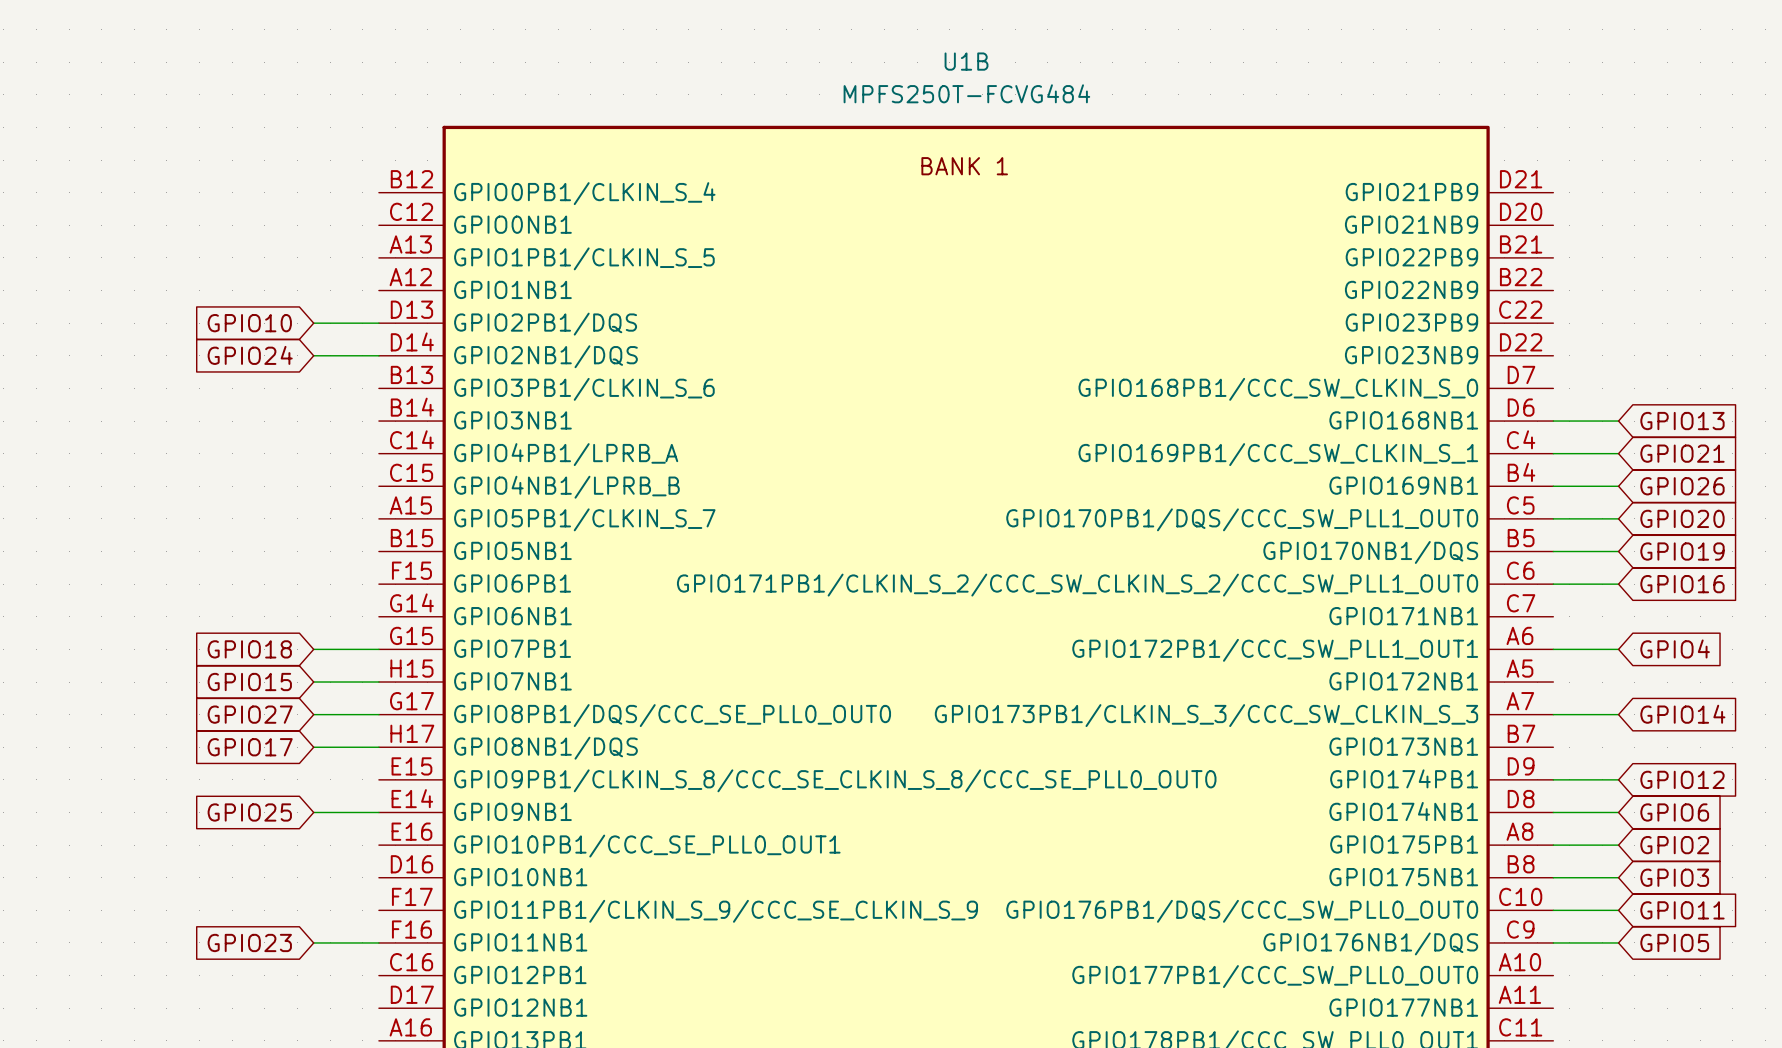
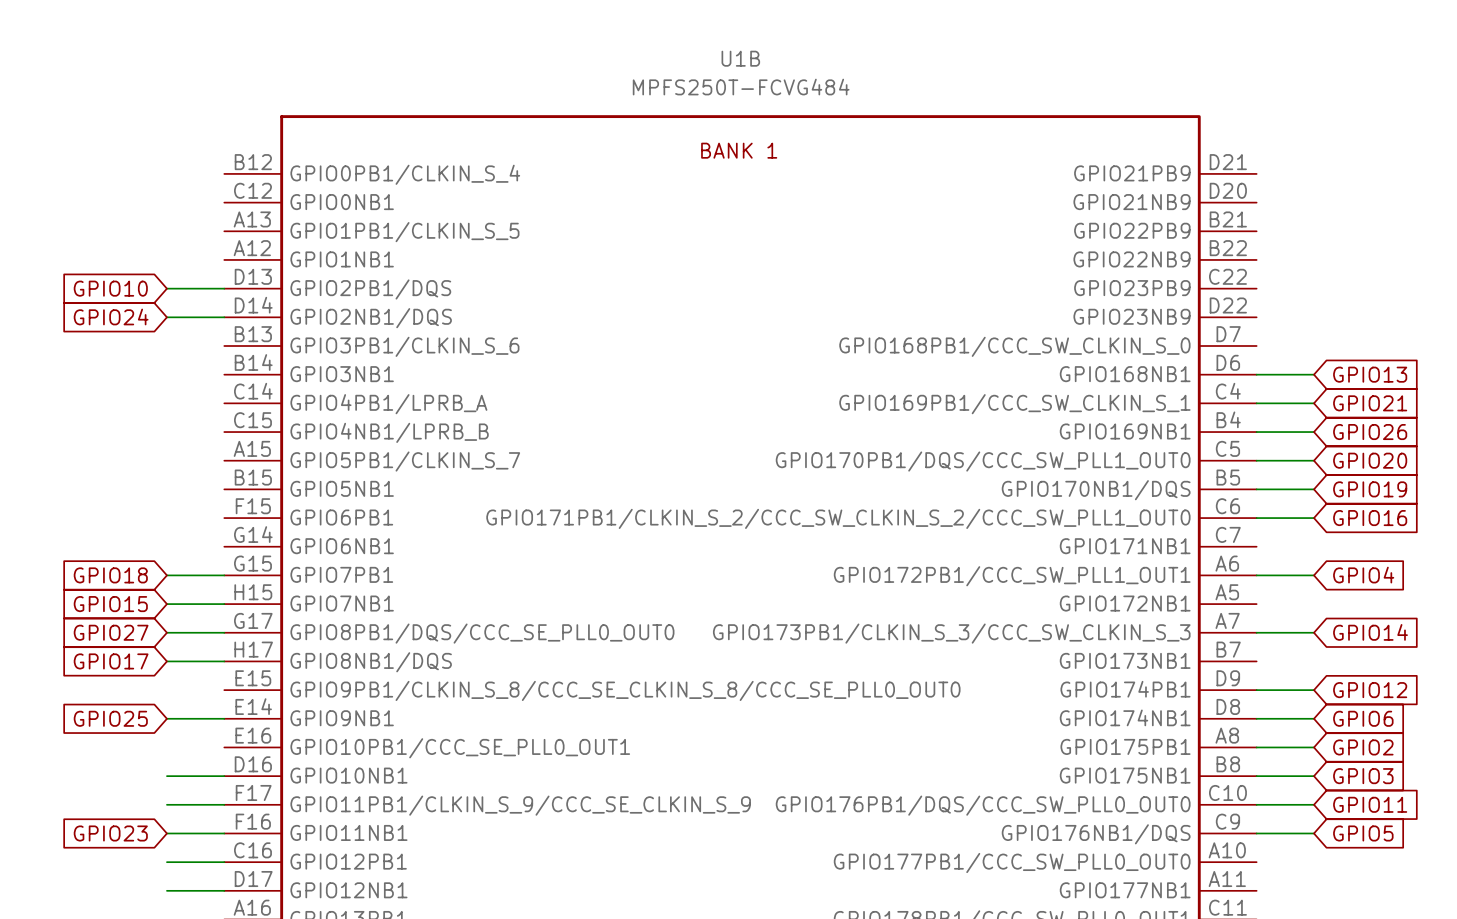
wire: none -> (166, 776) (224, 776)
wire: none -> (166, 804) (224, 804)
wire: none -> (166, 862) (224, 862)
wire: none -> (166, 890) (224, 890)

